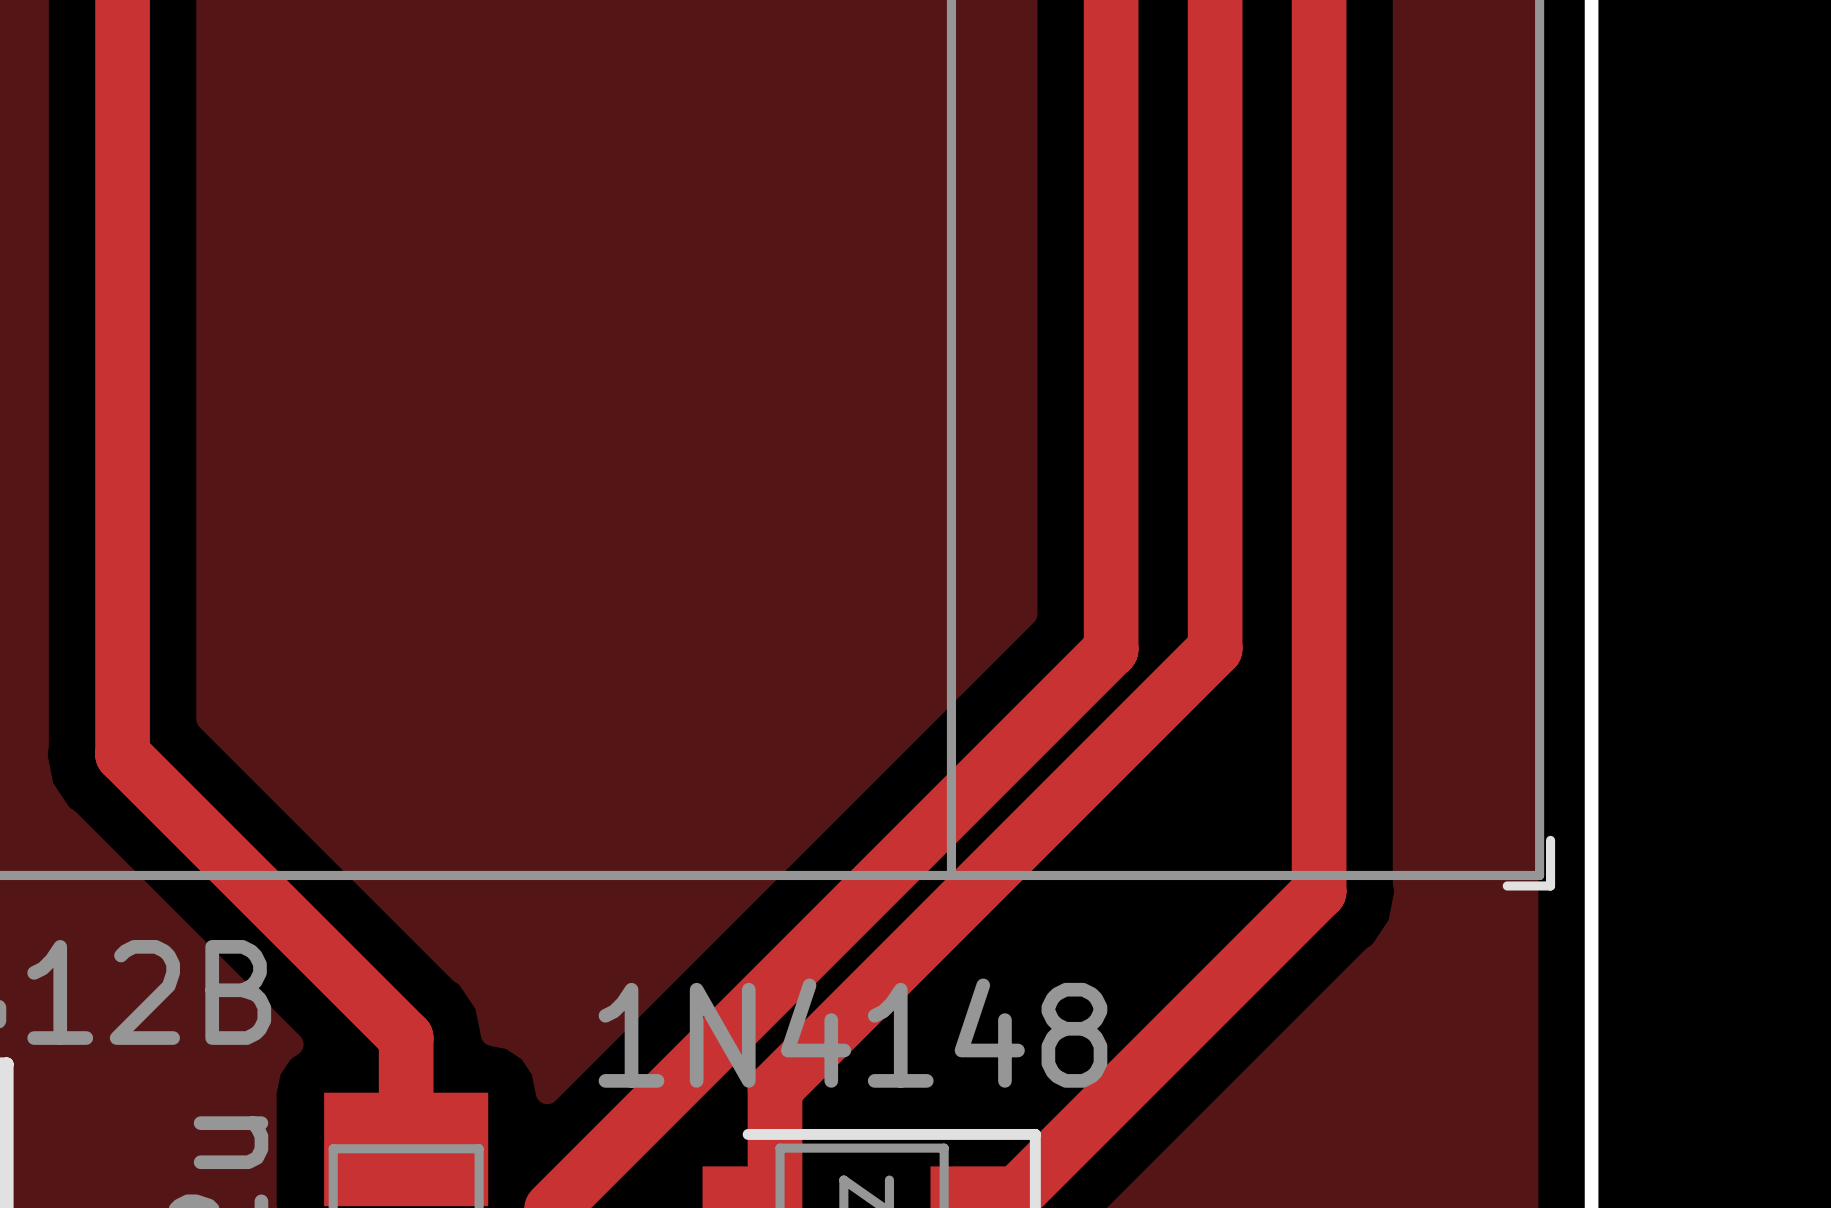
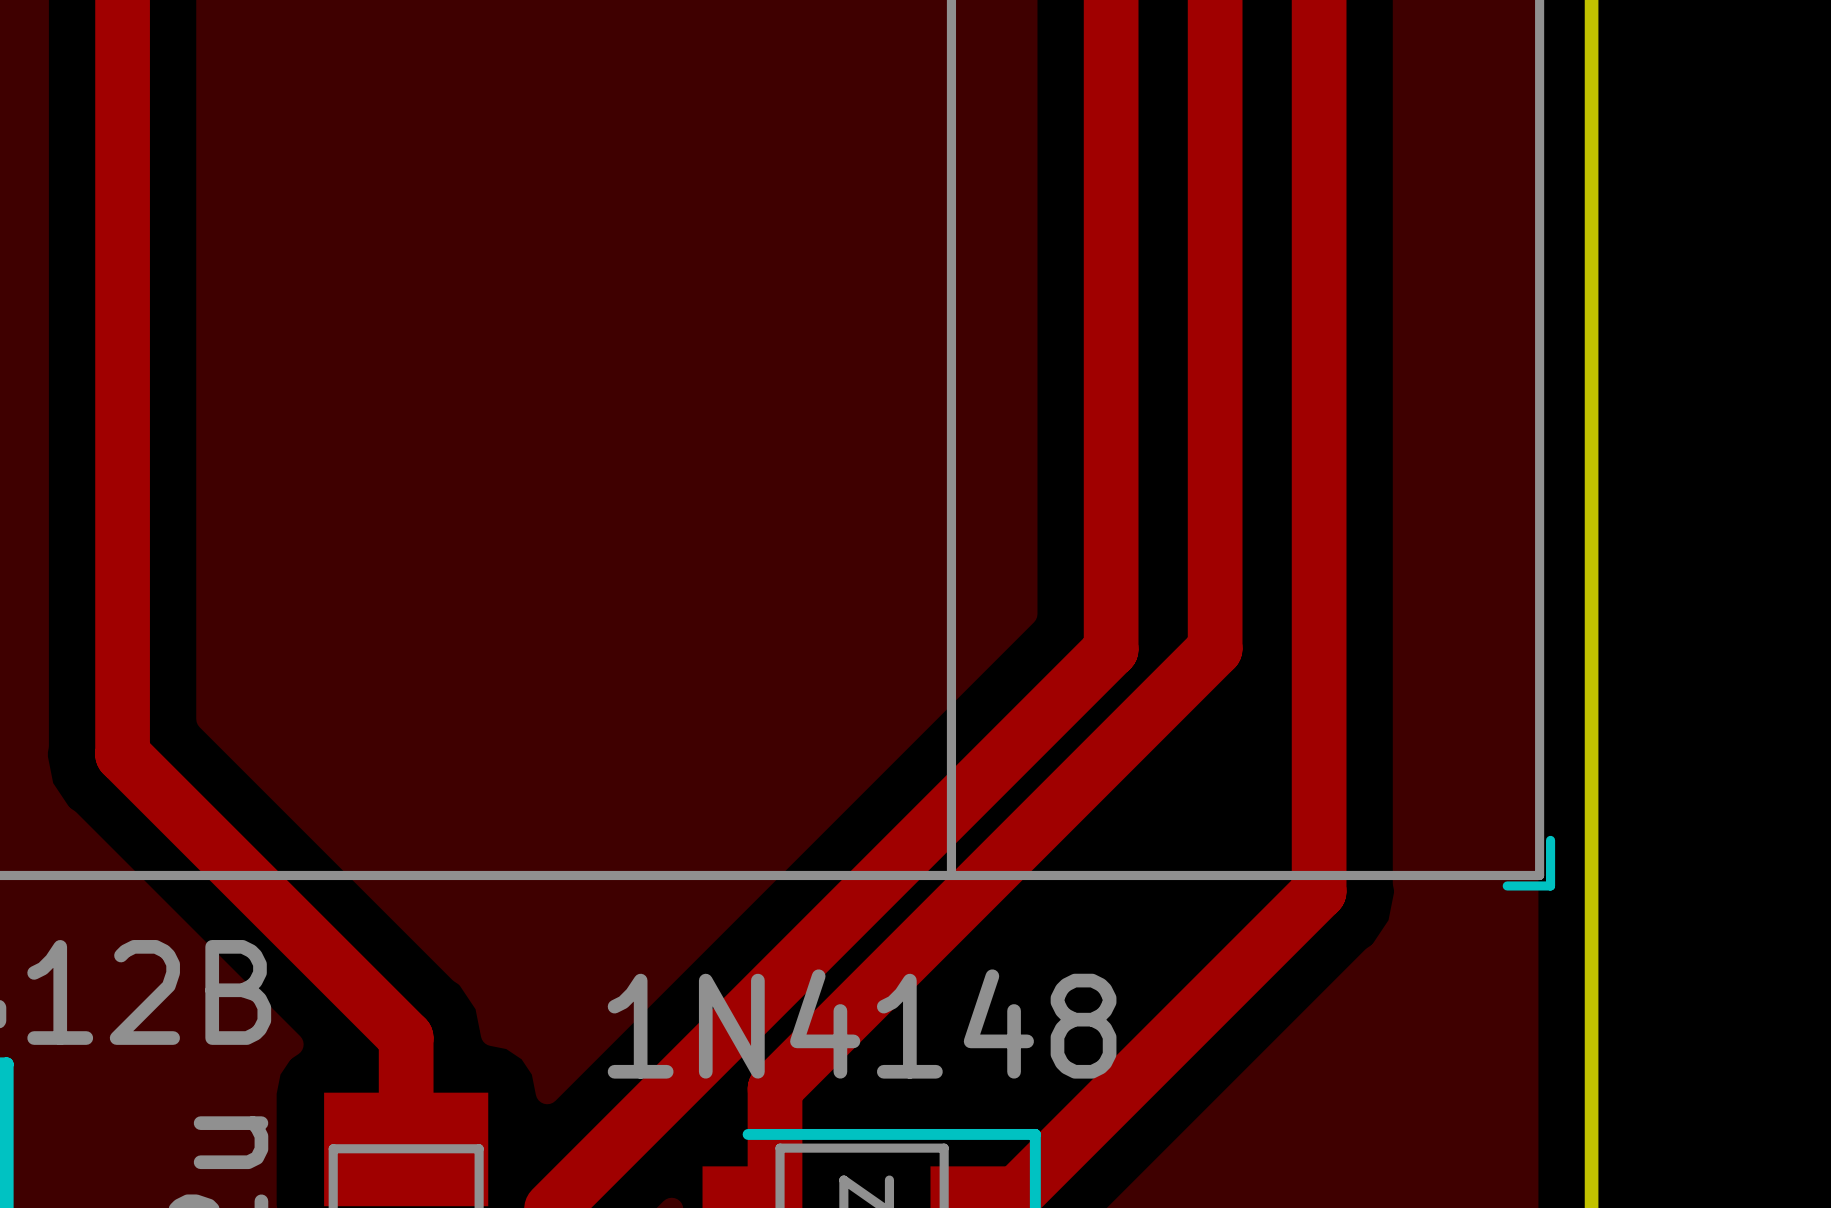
part value position: 1N4148 (852, 1033) -> 1N4148 (862, 1024)

